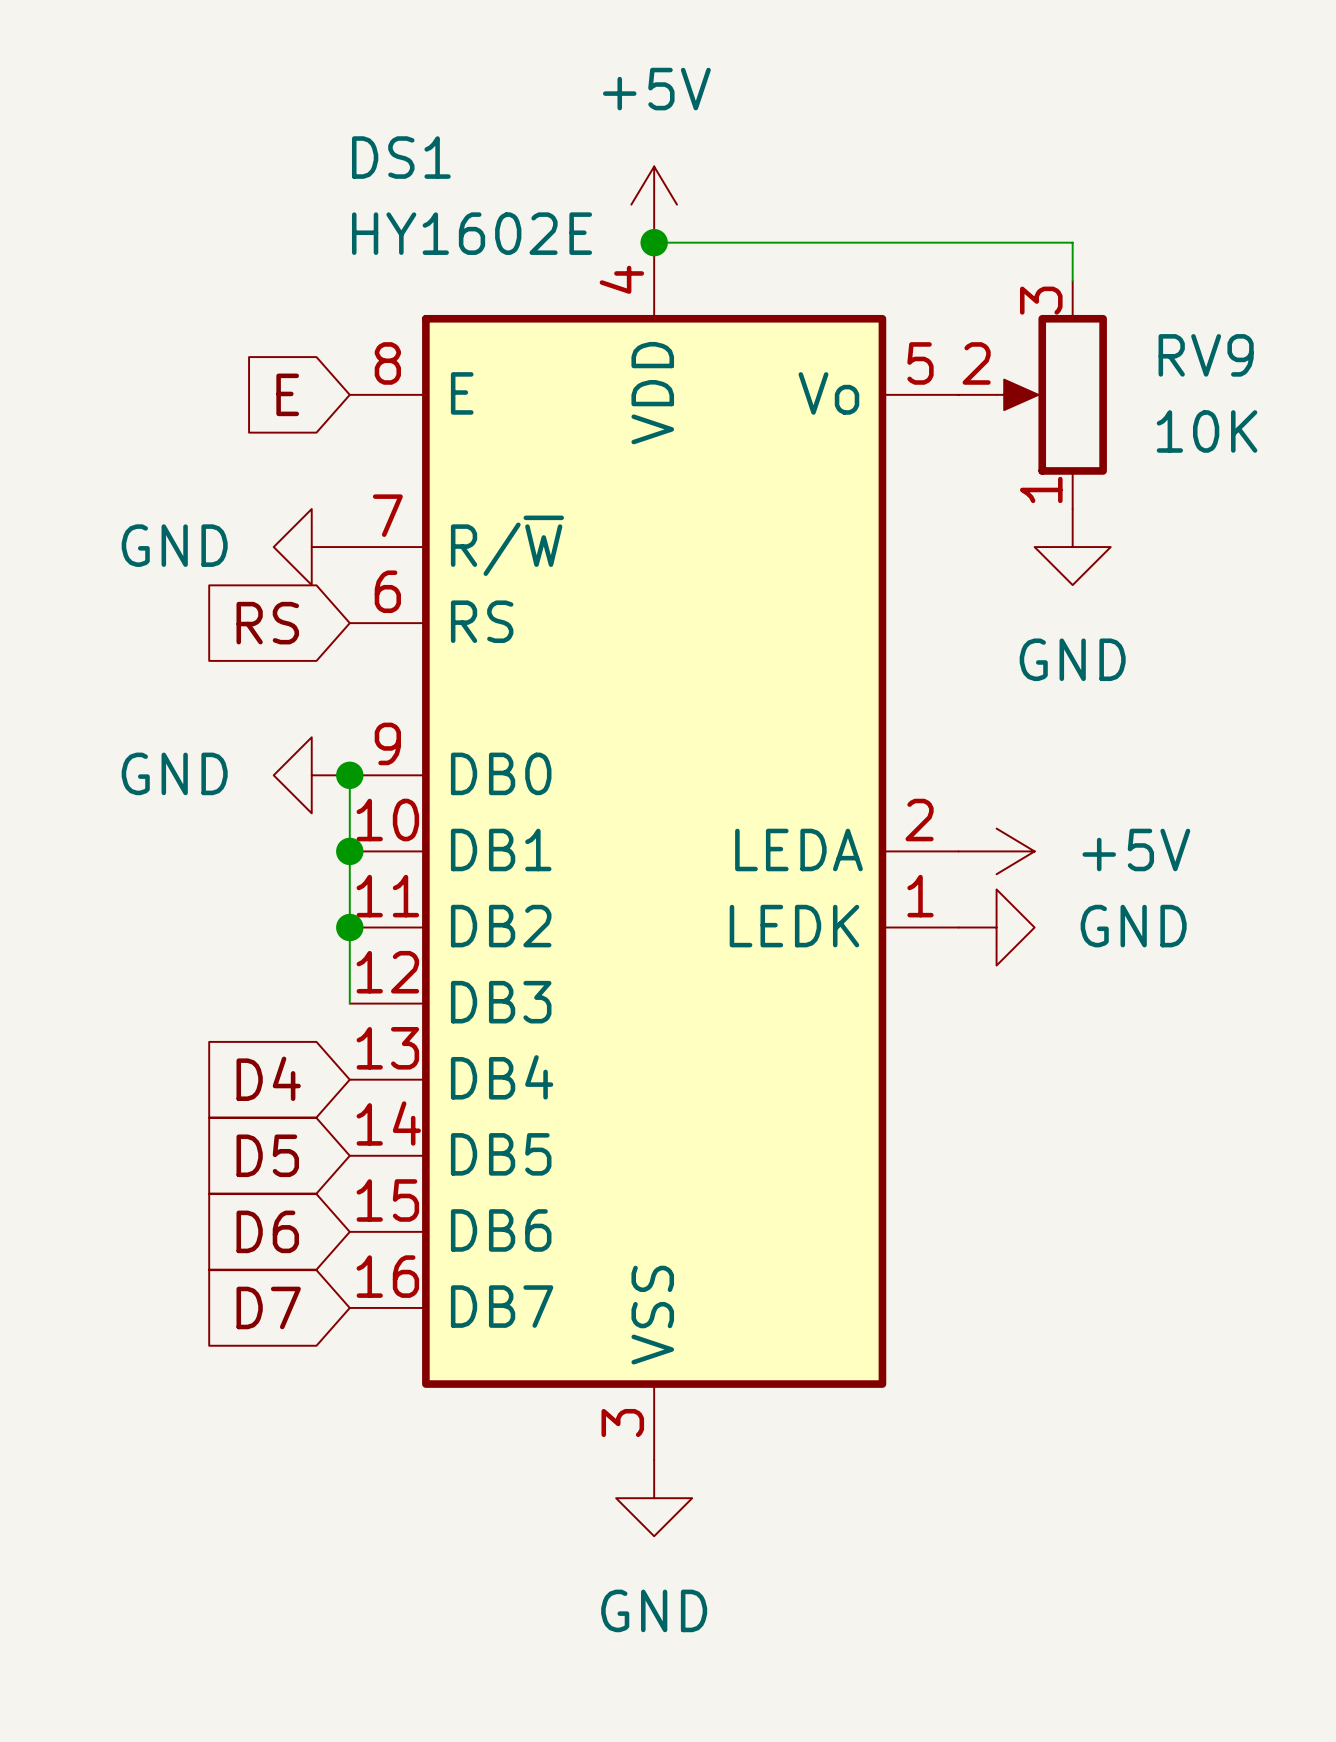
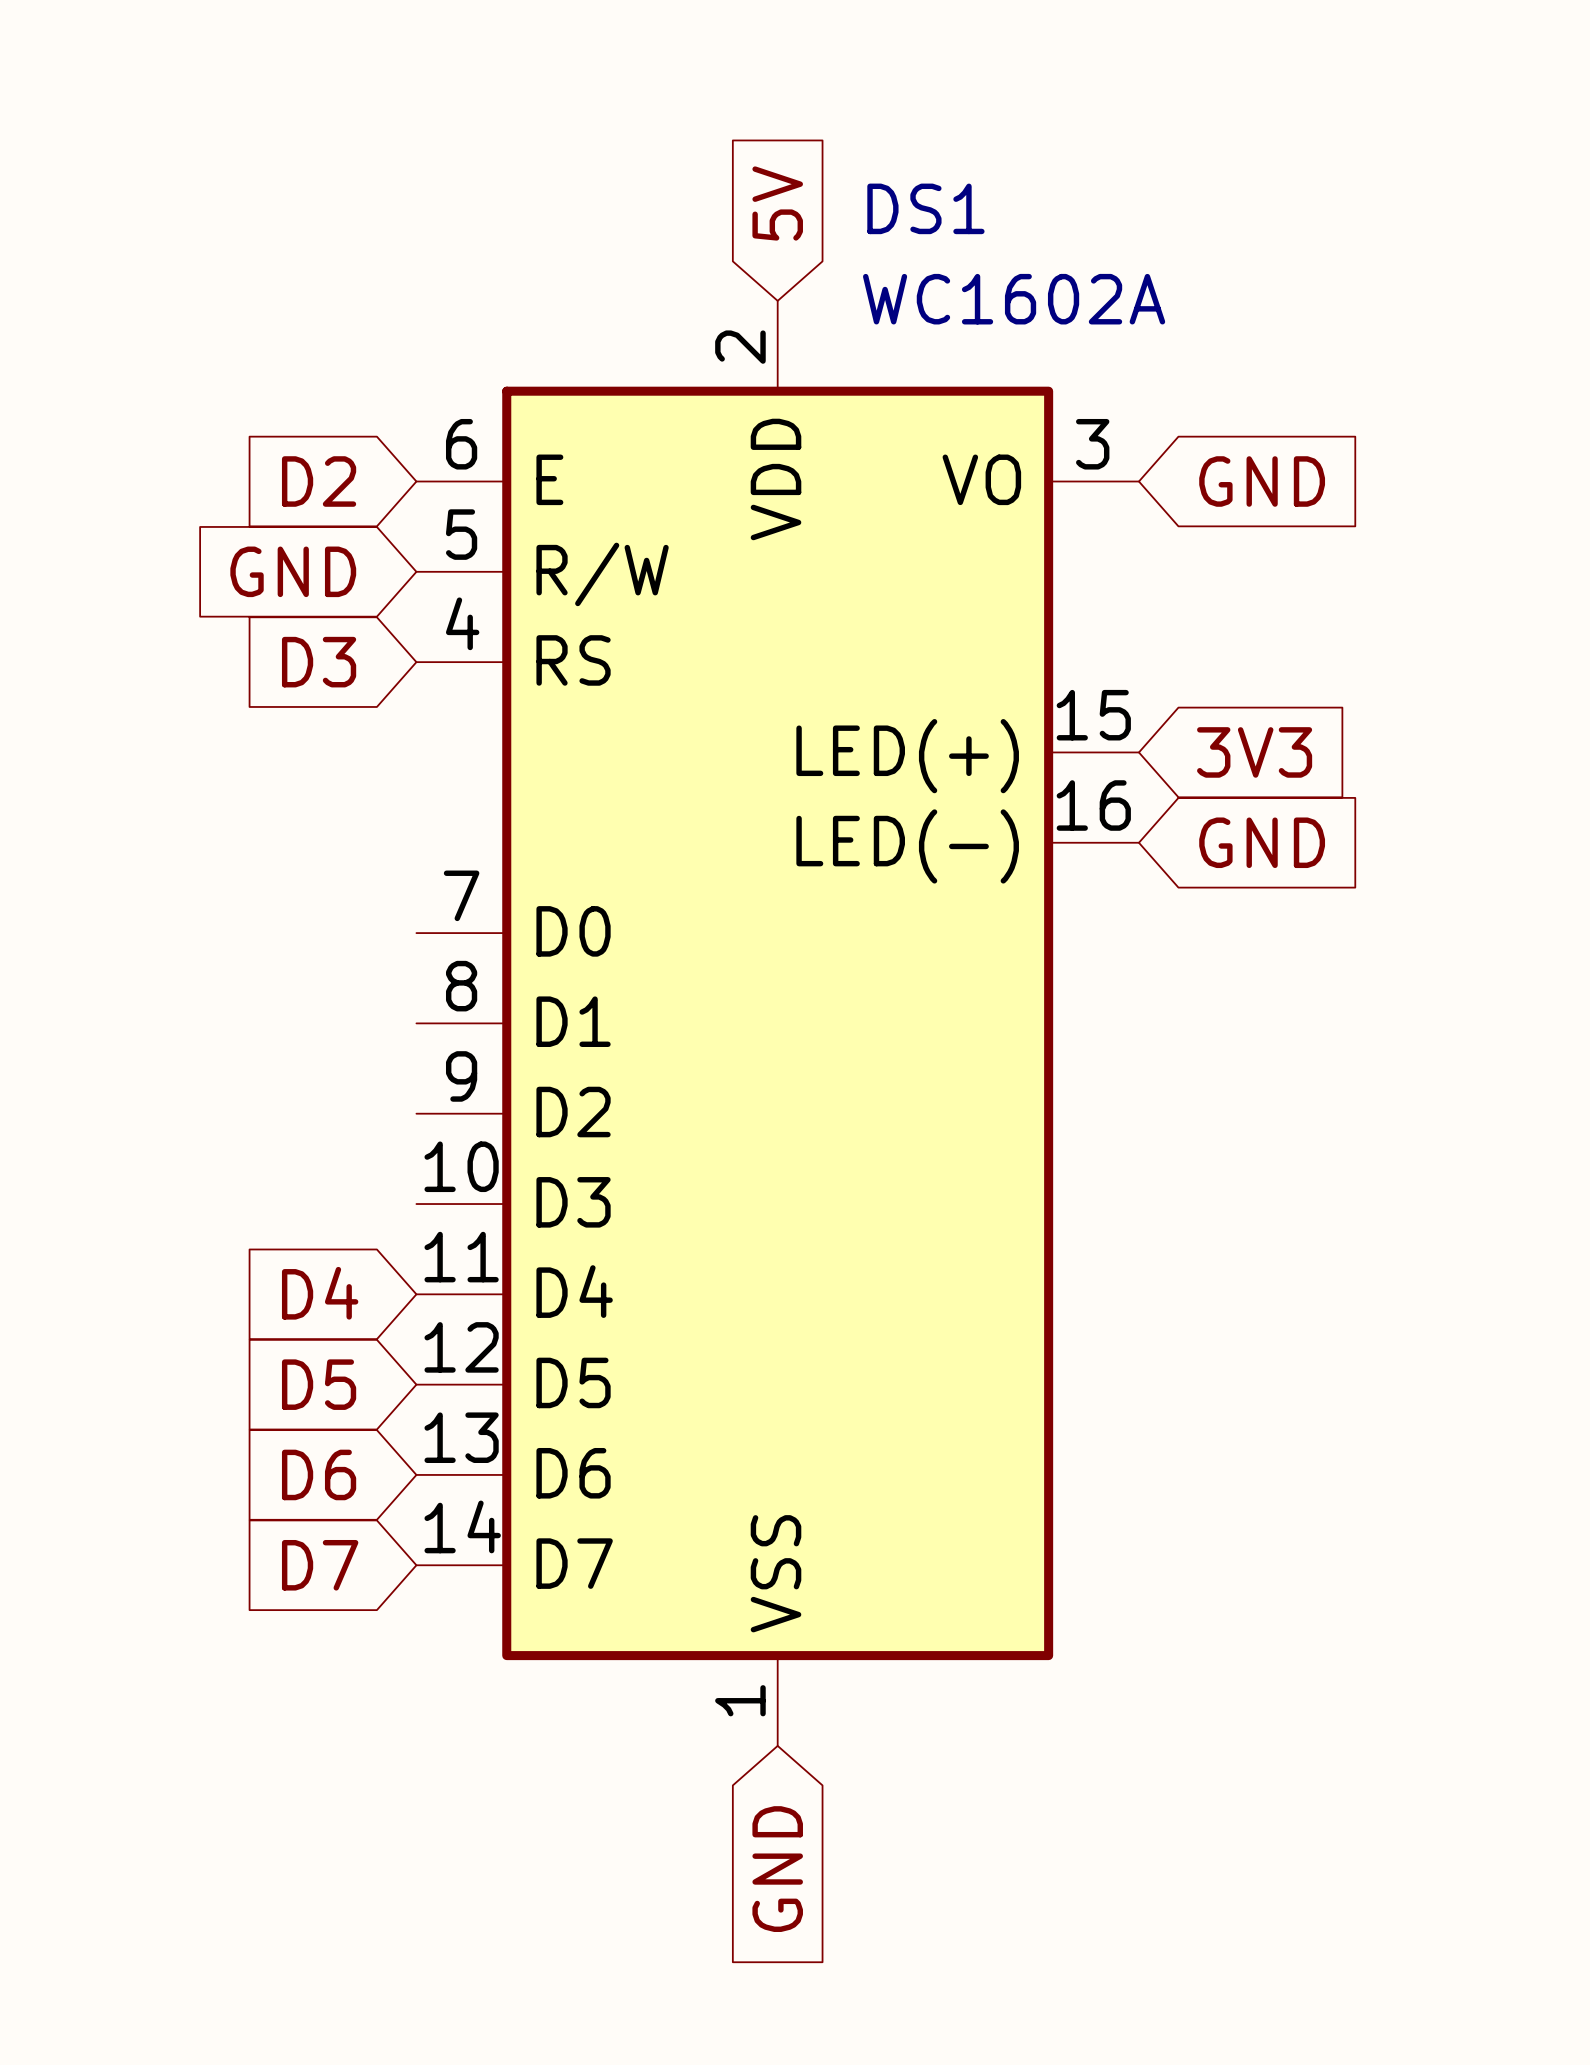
DS1 name position: DS1 (401, 157) -> DS1 (925, 208)
global label: none -> 5V (777, 203)
power symbol: +5V (654, 204) -> none
DS1 value: HY1602E (472, 233) -> WC1602A (1014, 299)
DS1 symbol: [349, 242, 959, 1461] -> [416, 300, 1139, 1746]
wire: (654, 242) (1072, 242) (1072, 280) -> none
junction: (654, 242) -> none
global label: E (287, 394) -> D2 (319, 481)
RV9: 10K (1032, 394) -> none
global label: none -> GND (1262, 481)
global label: none -> GND (293, 571)
global label: none -> D3 (319, 662)
power symbol: GND (311, 547) -> none
power symbol: GND (1072, 547) -> none
global label: RS (267, 623) -> none
global label: none -> 3V3 (1254, 752)
global label: none -> GND (1262, 842)
power symbol: GND (311, 775) -> none
wire: (349, 775) (349, 1003) -> none
junction: (349, 775) -> none
junction: (349, 851) -> none
power symbol: +5V (996, 851) -> none
junction: (349, 927) -> none
power symbol: GND (996, 927) -> none
power symbol: GND (654, 1498) -> none
global label: none -> GND (777, 1869)

